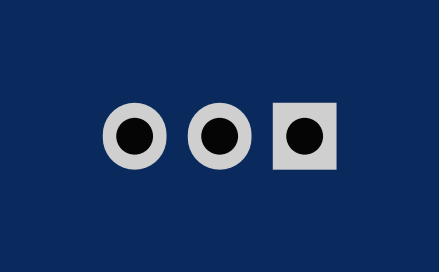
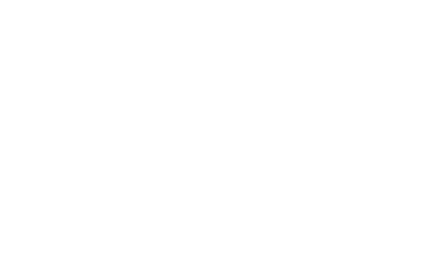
part: (219, 136) -> none

